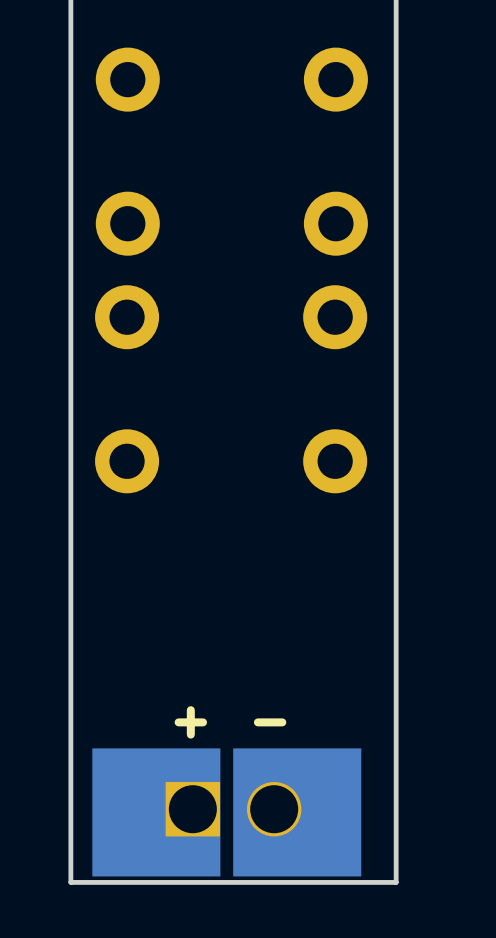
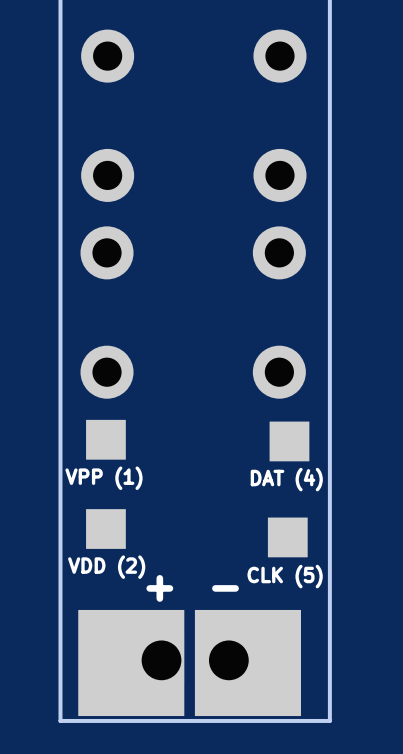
part: none -> VPP (1) (105, 439)
part: none -> DAT (4) (289, 441)
part: none -> VDD (2) (105, 529)
part: none -> CLK (5) (287, 537)

